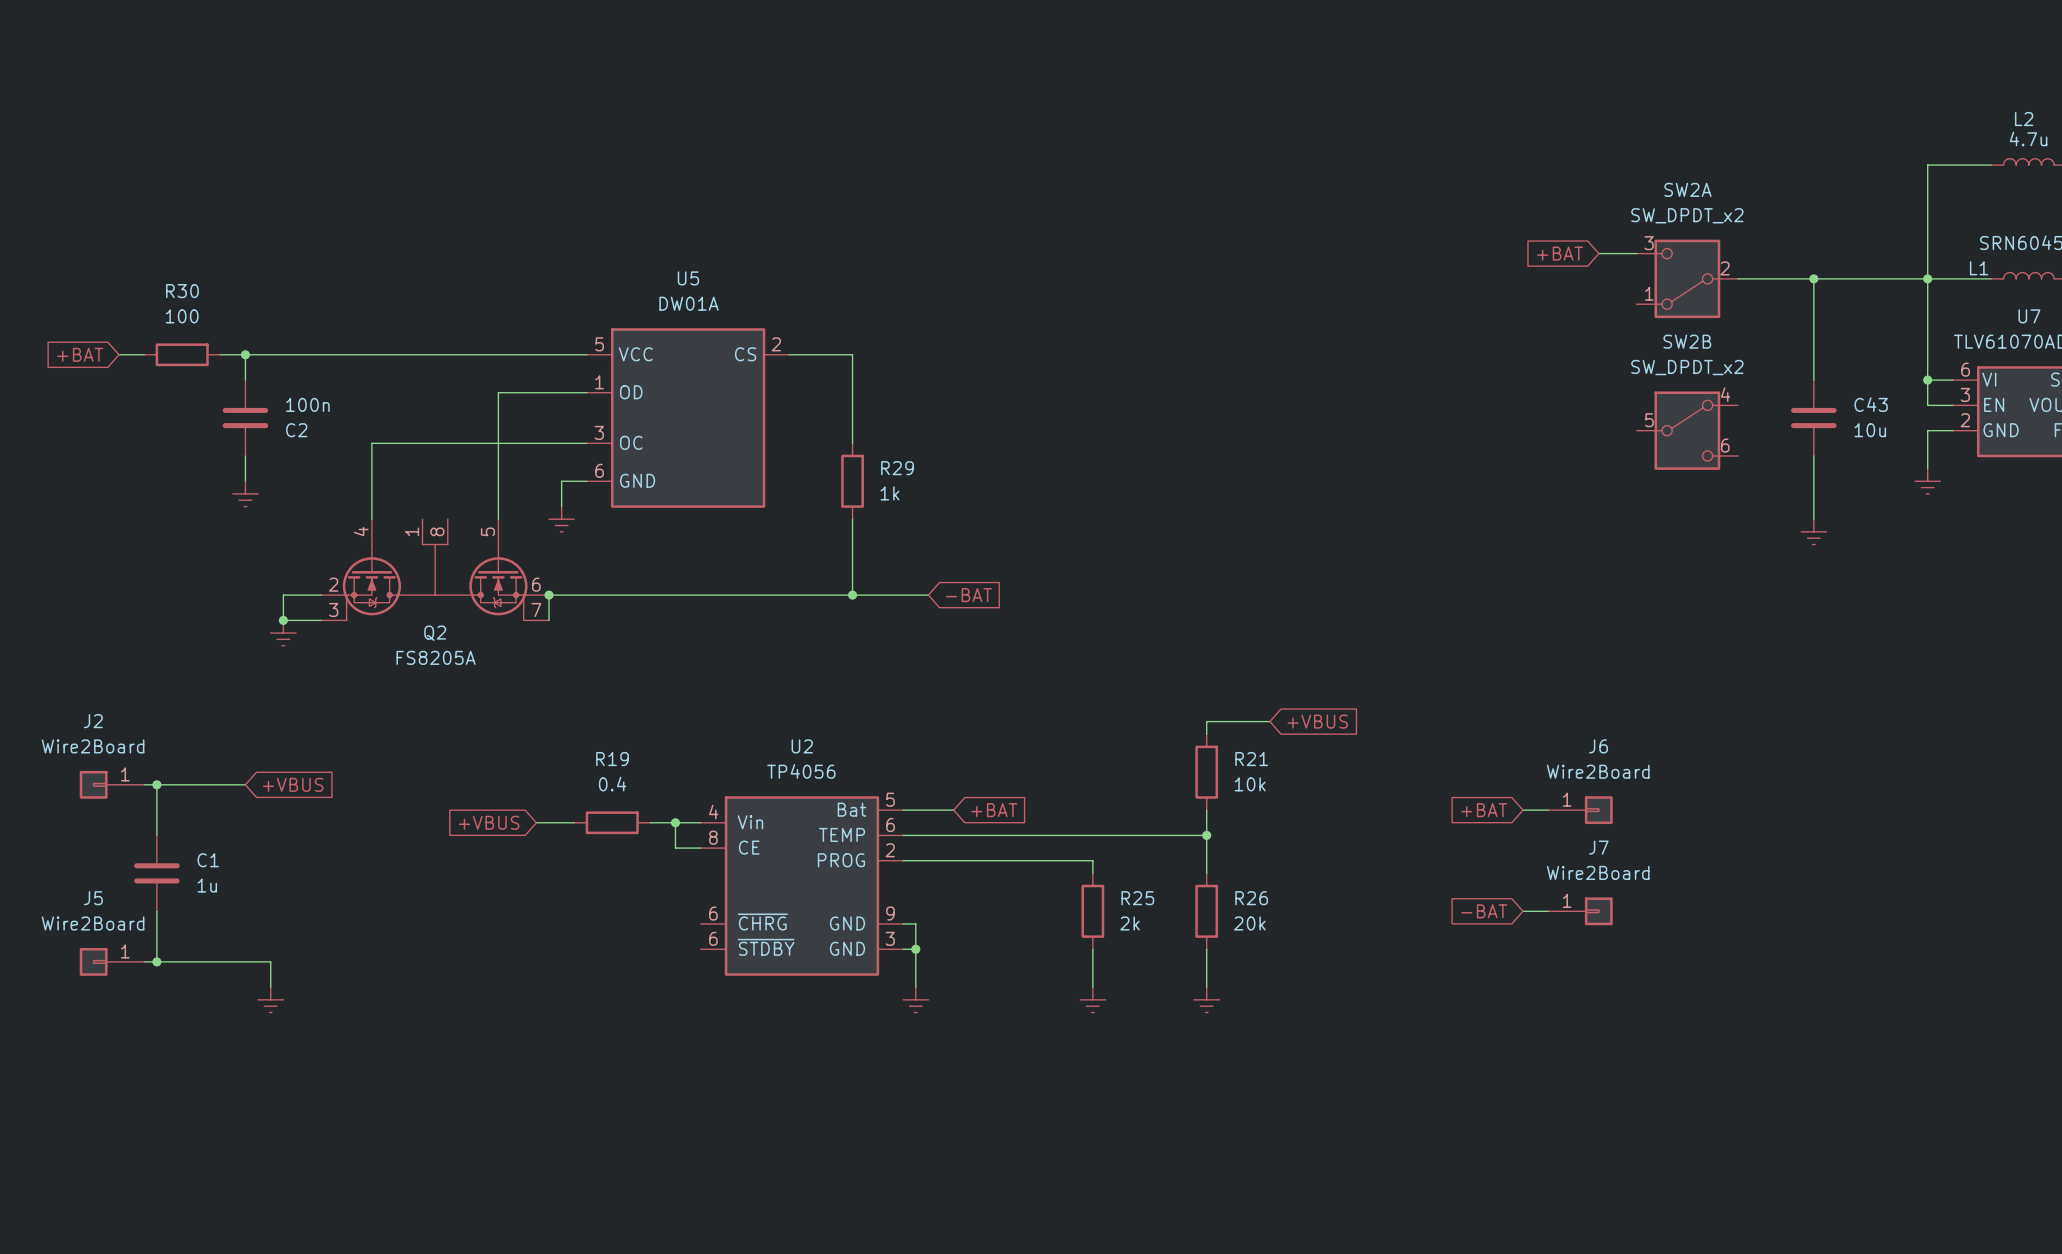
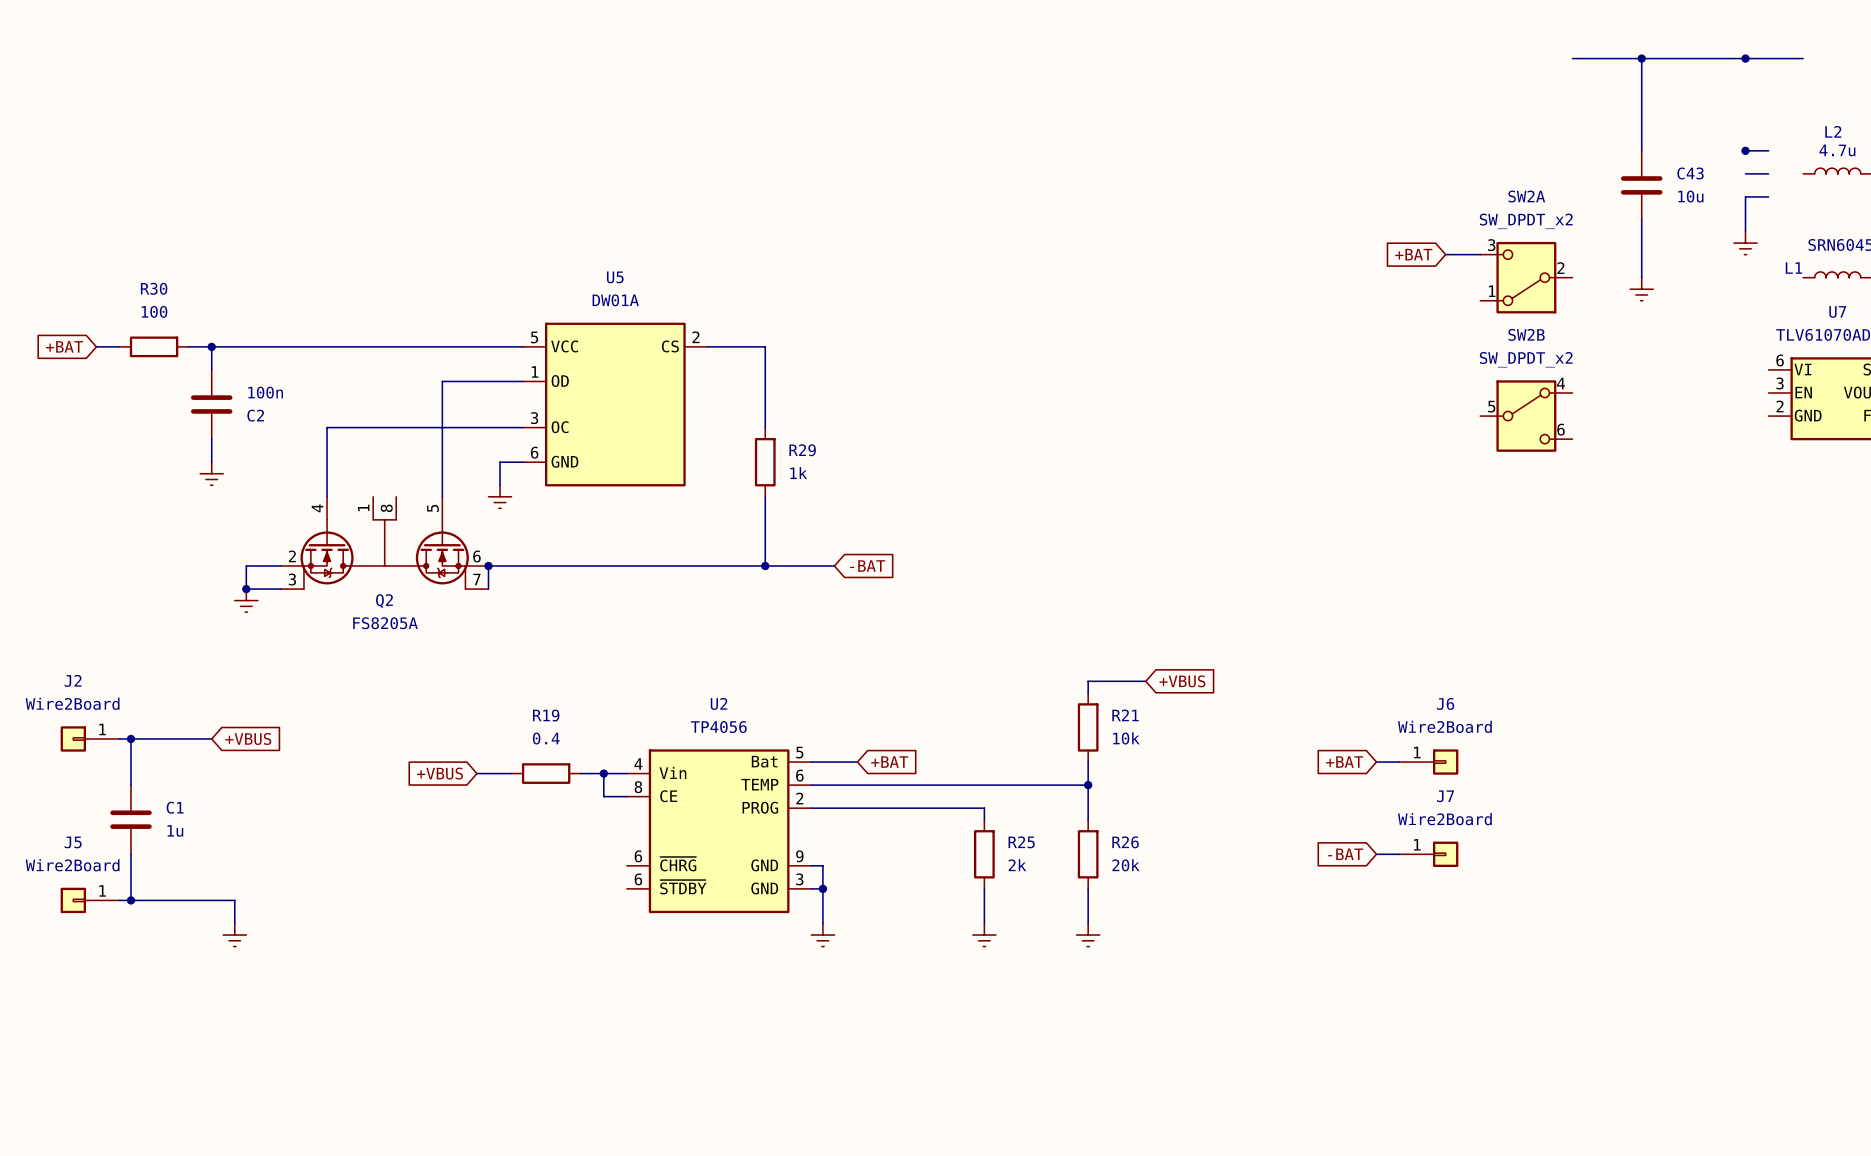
wire: none -> (1641, 58) (1641, 150)
junction: none -> (1641, 58)
junction: none -> (1745, 58)
junction: none -> (1745, 150)
wire: (1927, 165) (1927, 190) -> (1768, 196) (1745, 196)
wire: (1952, 165) (1990, 165) -> none
wire: (1927, 228) (1927, 405) (1952, 405) -> none
power symbol: none -> (1745, 243)
wire: (1737, 278) (1990, 278) -> (1572, 58) (1803, 58)
wire: (1813, 278) (1813, 380) -> (1641, 277) (1641, 220)
junction: (1813, 278) -> none
junction: (1927, 278) -> none
power symbol: none -> (1641, 289)
wire: (1927, 380) (1952, 380) -> (1745, 150) (1768, 150)
junction: (1927, 380) -> none
C43 position: (1813, 418) -> (1641, 185)
wire: (1952, 430) (1927, 430) (1927, 468) -> none
wire: (1813, 455) (1813, 519) -> none
power symbol: (1927, 481) -> none
power symbol: (1813, 531) -> none

